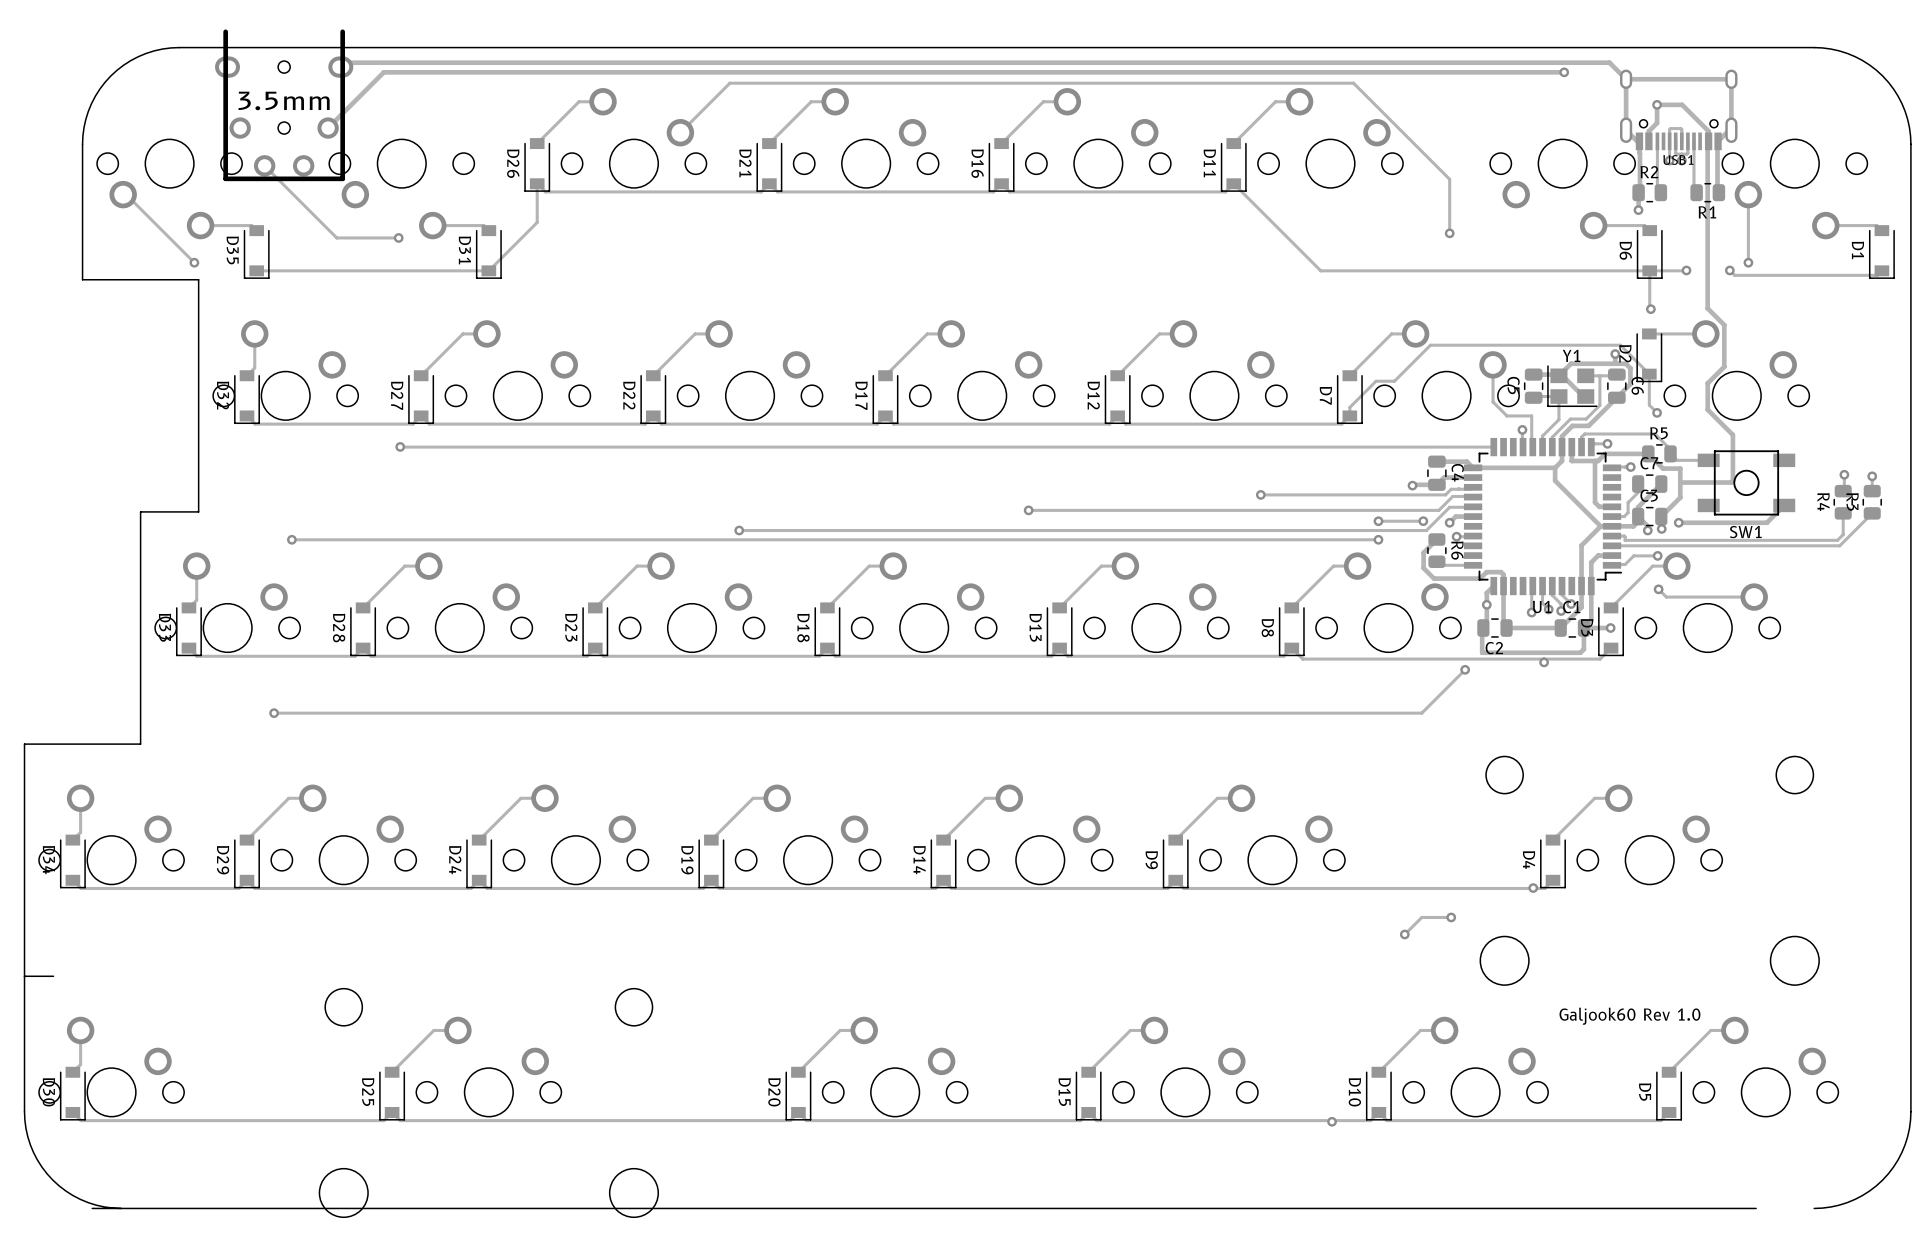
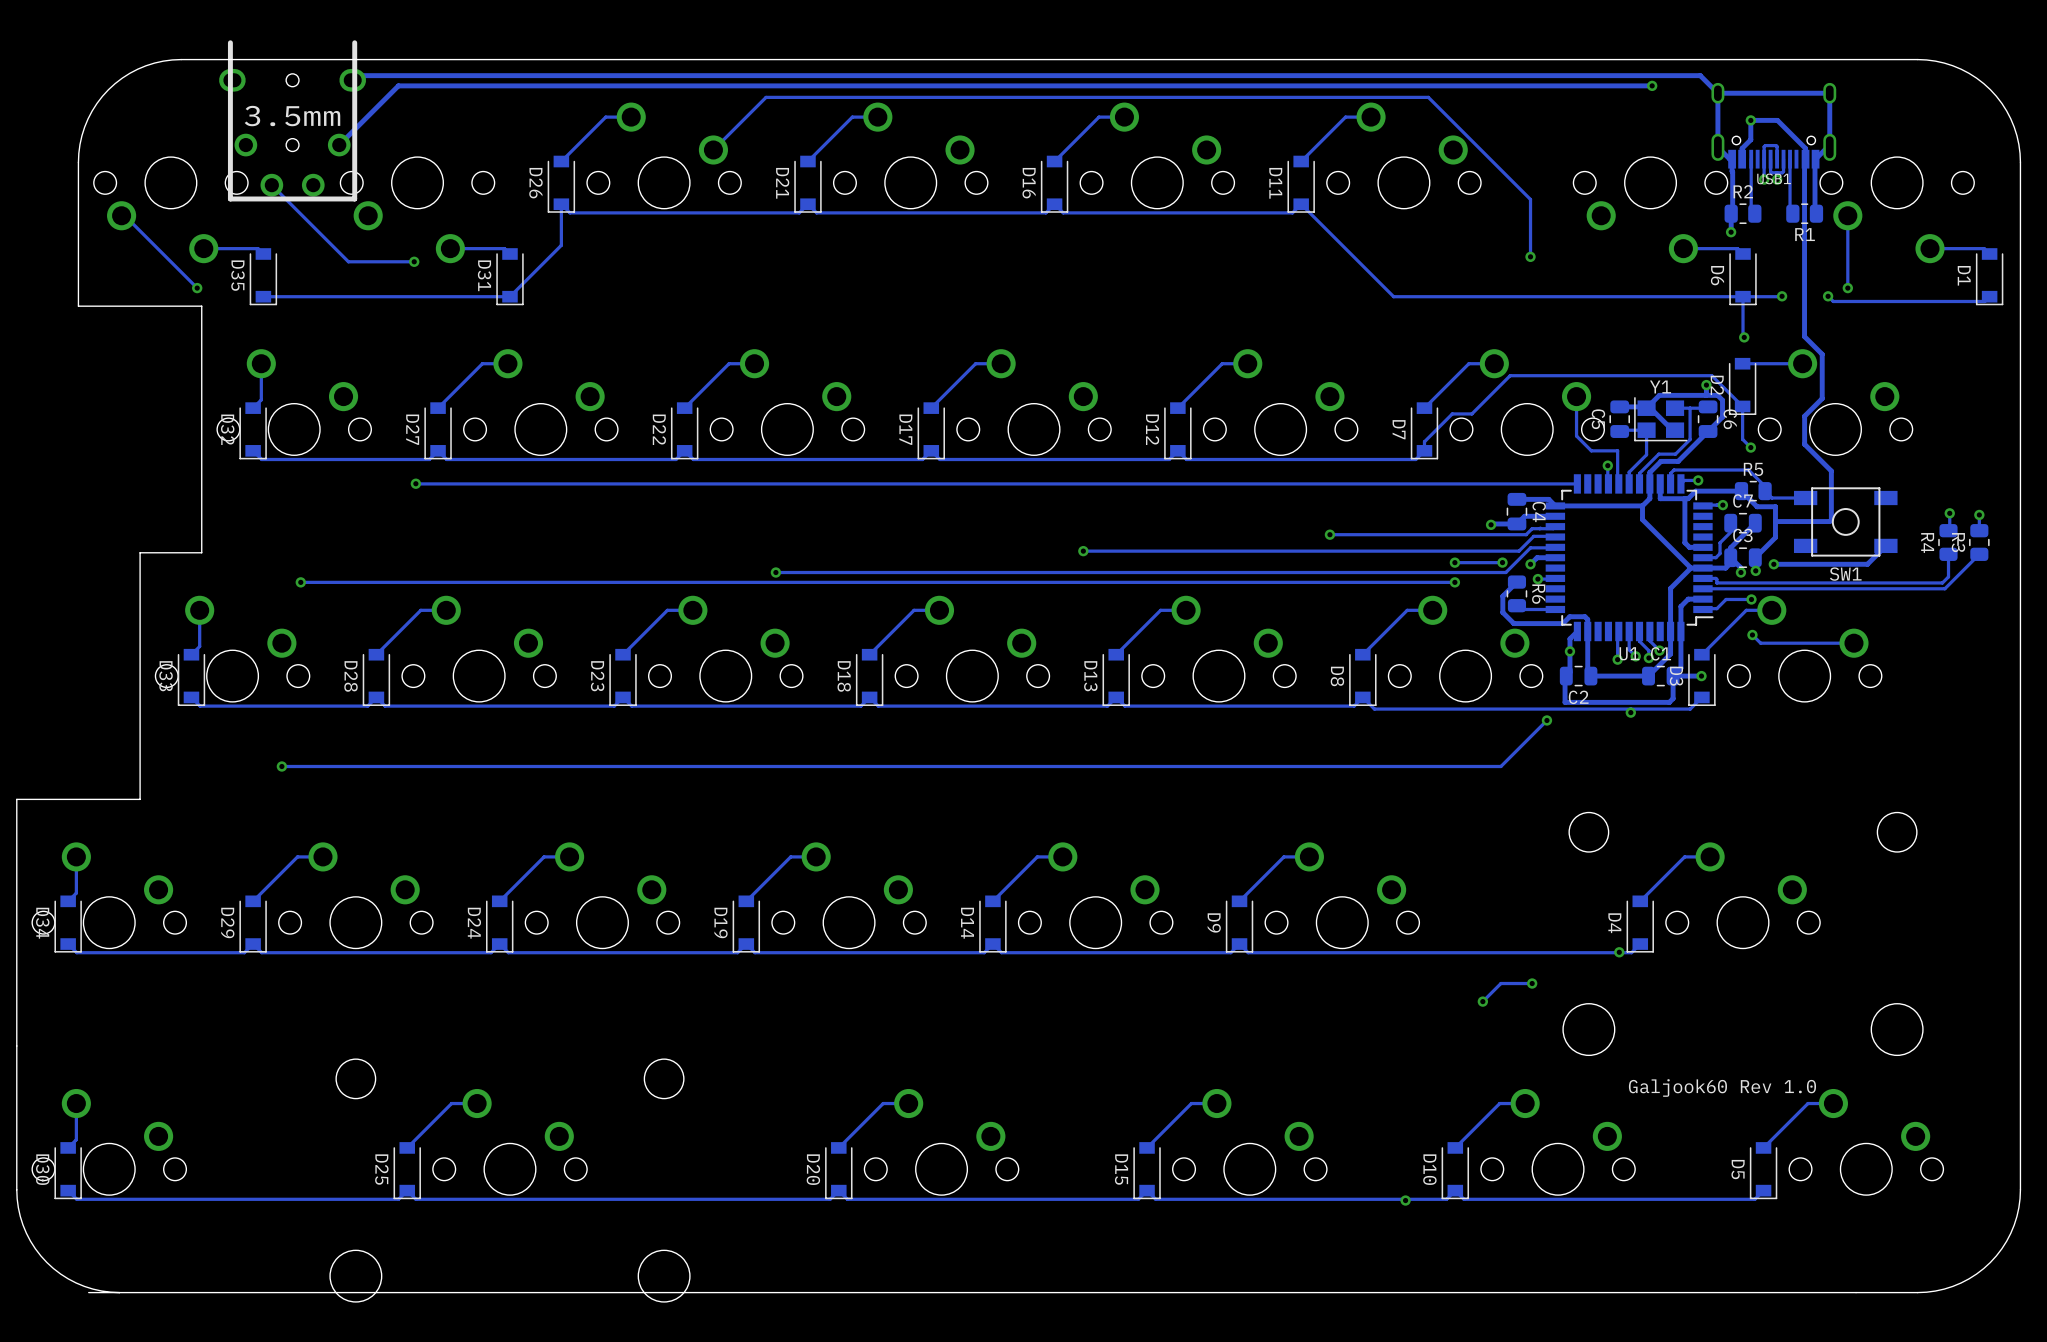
board edge: (53, 976) (24, 976) -> none
board edge: none -> (1917, 1292) (1856, 1292)

